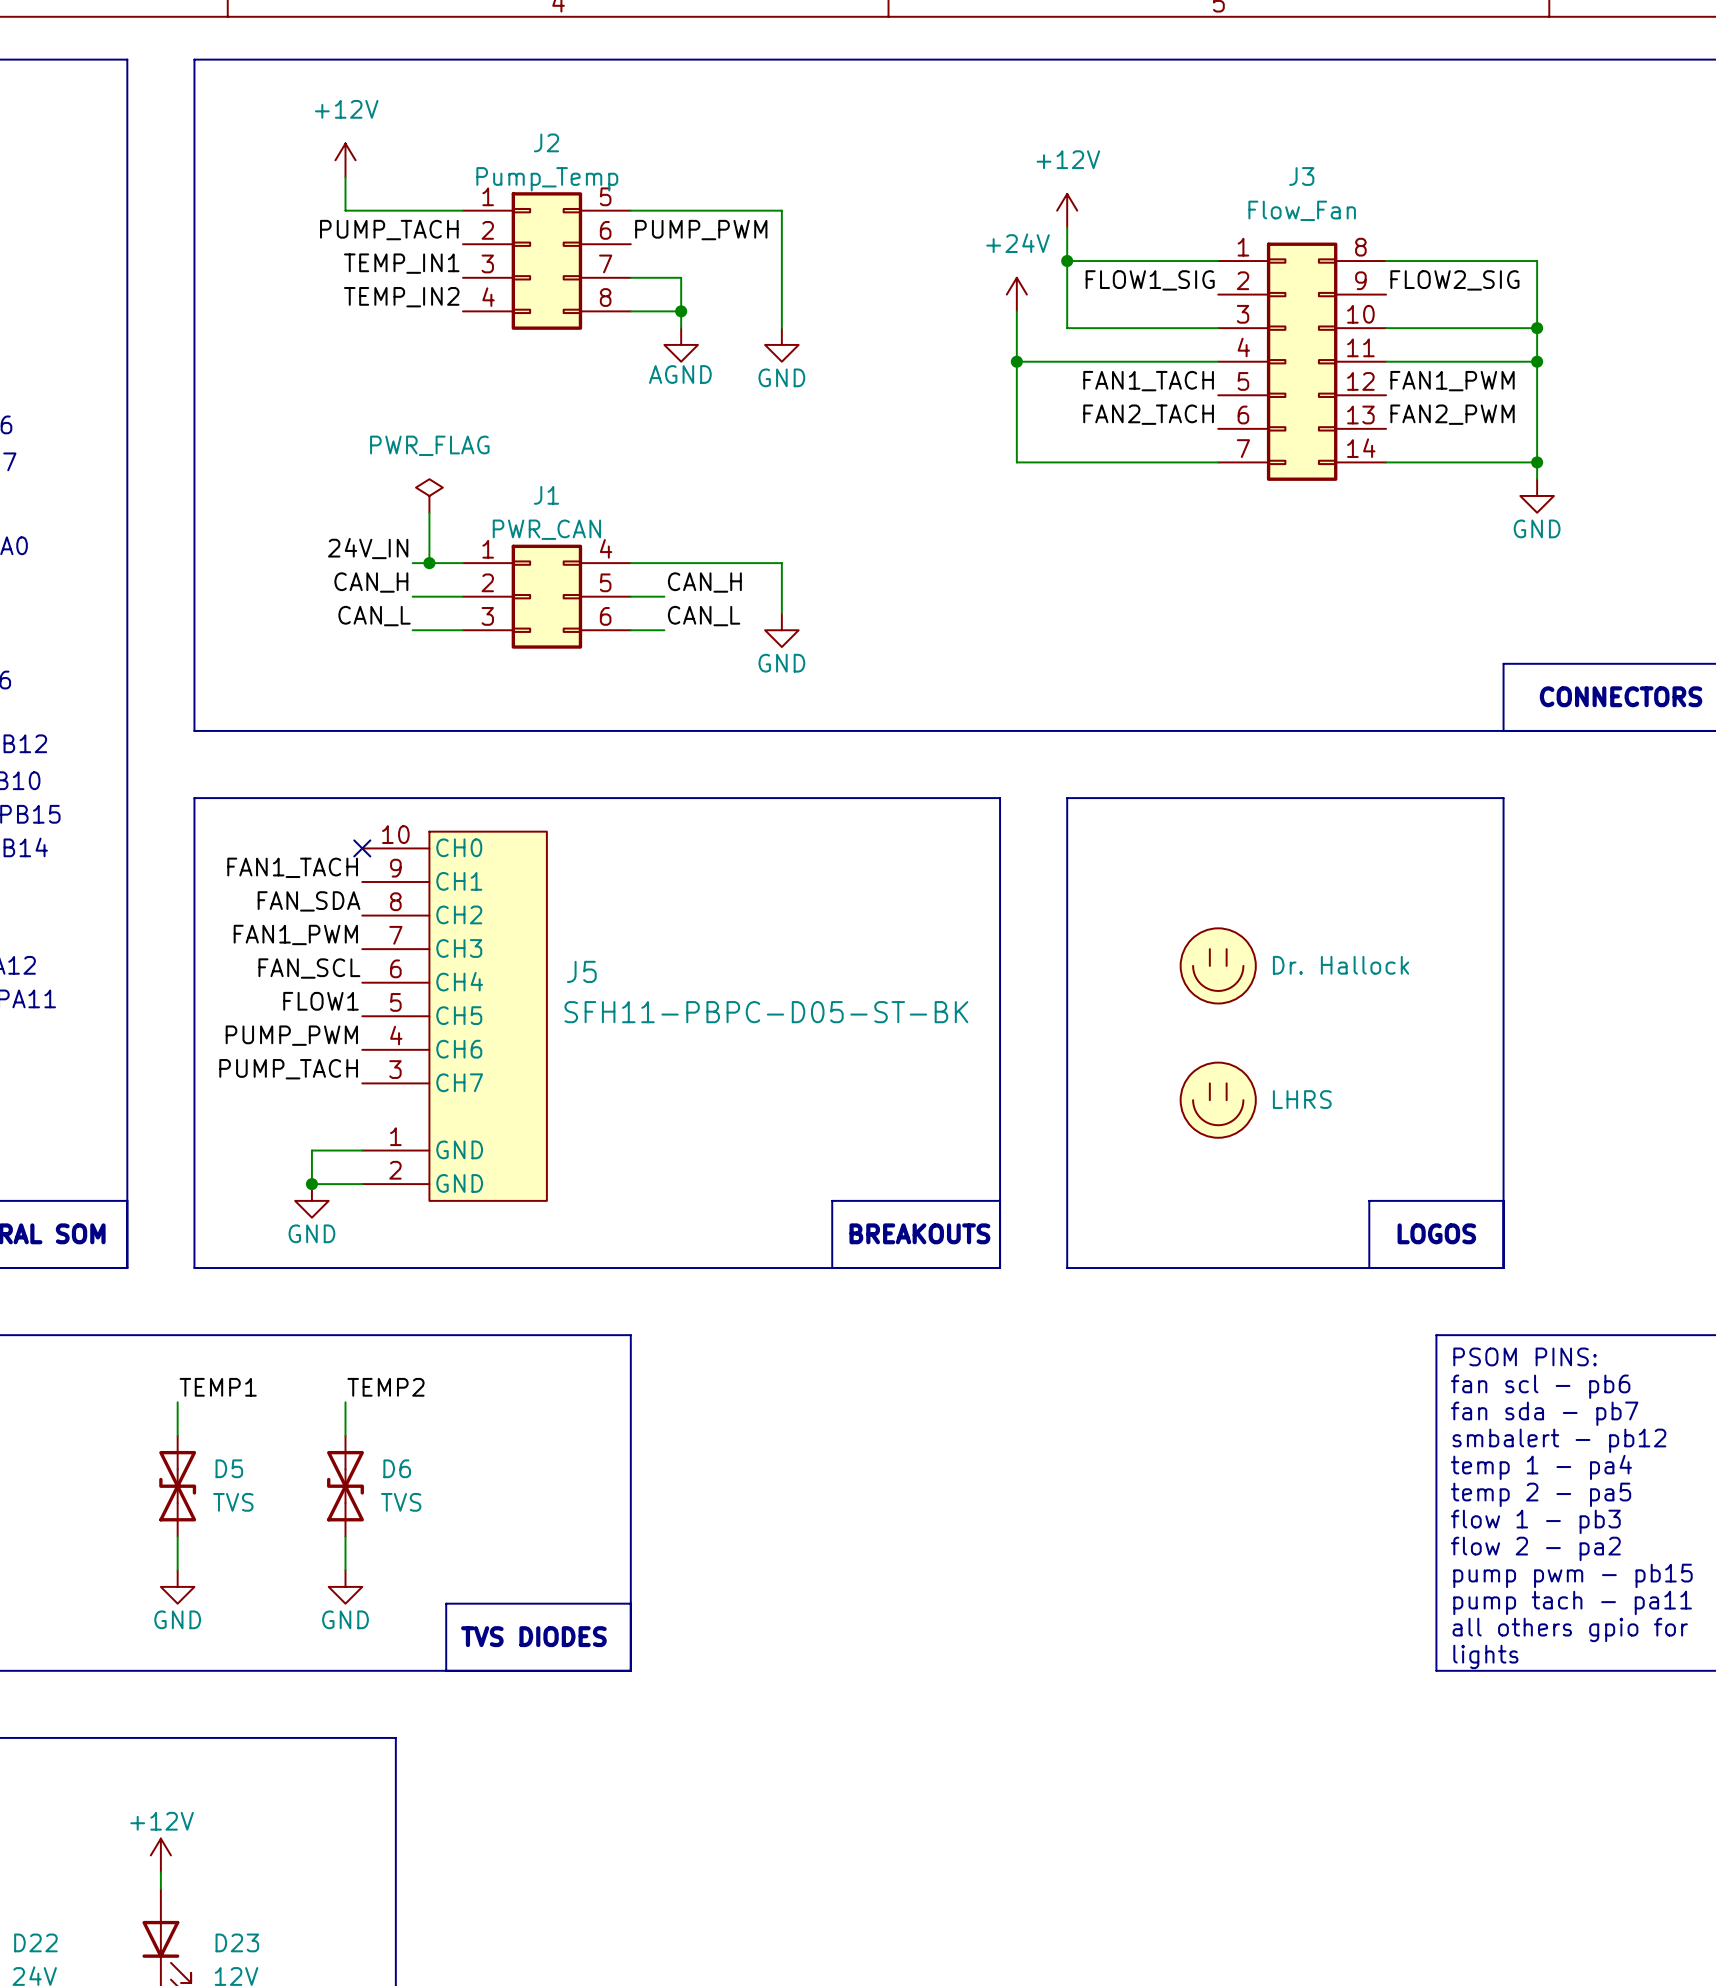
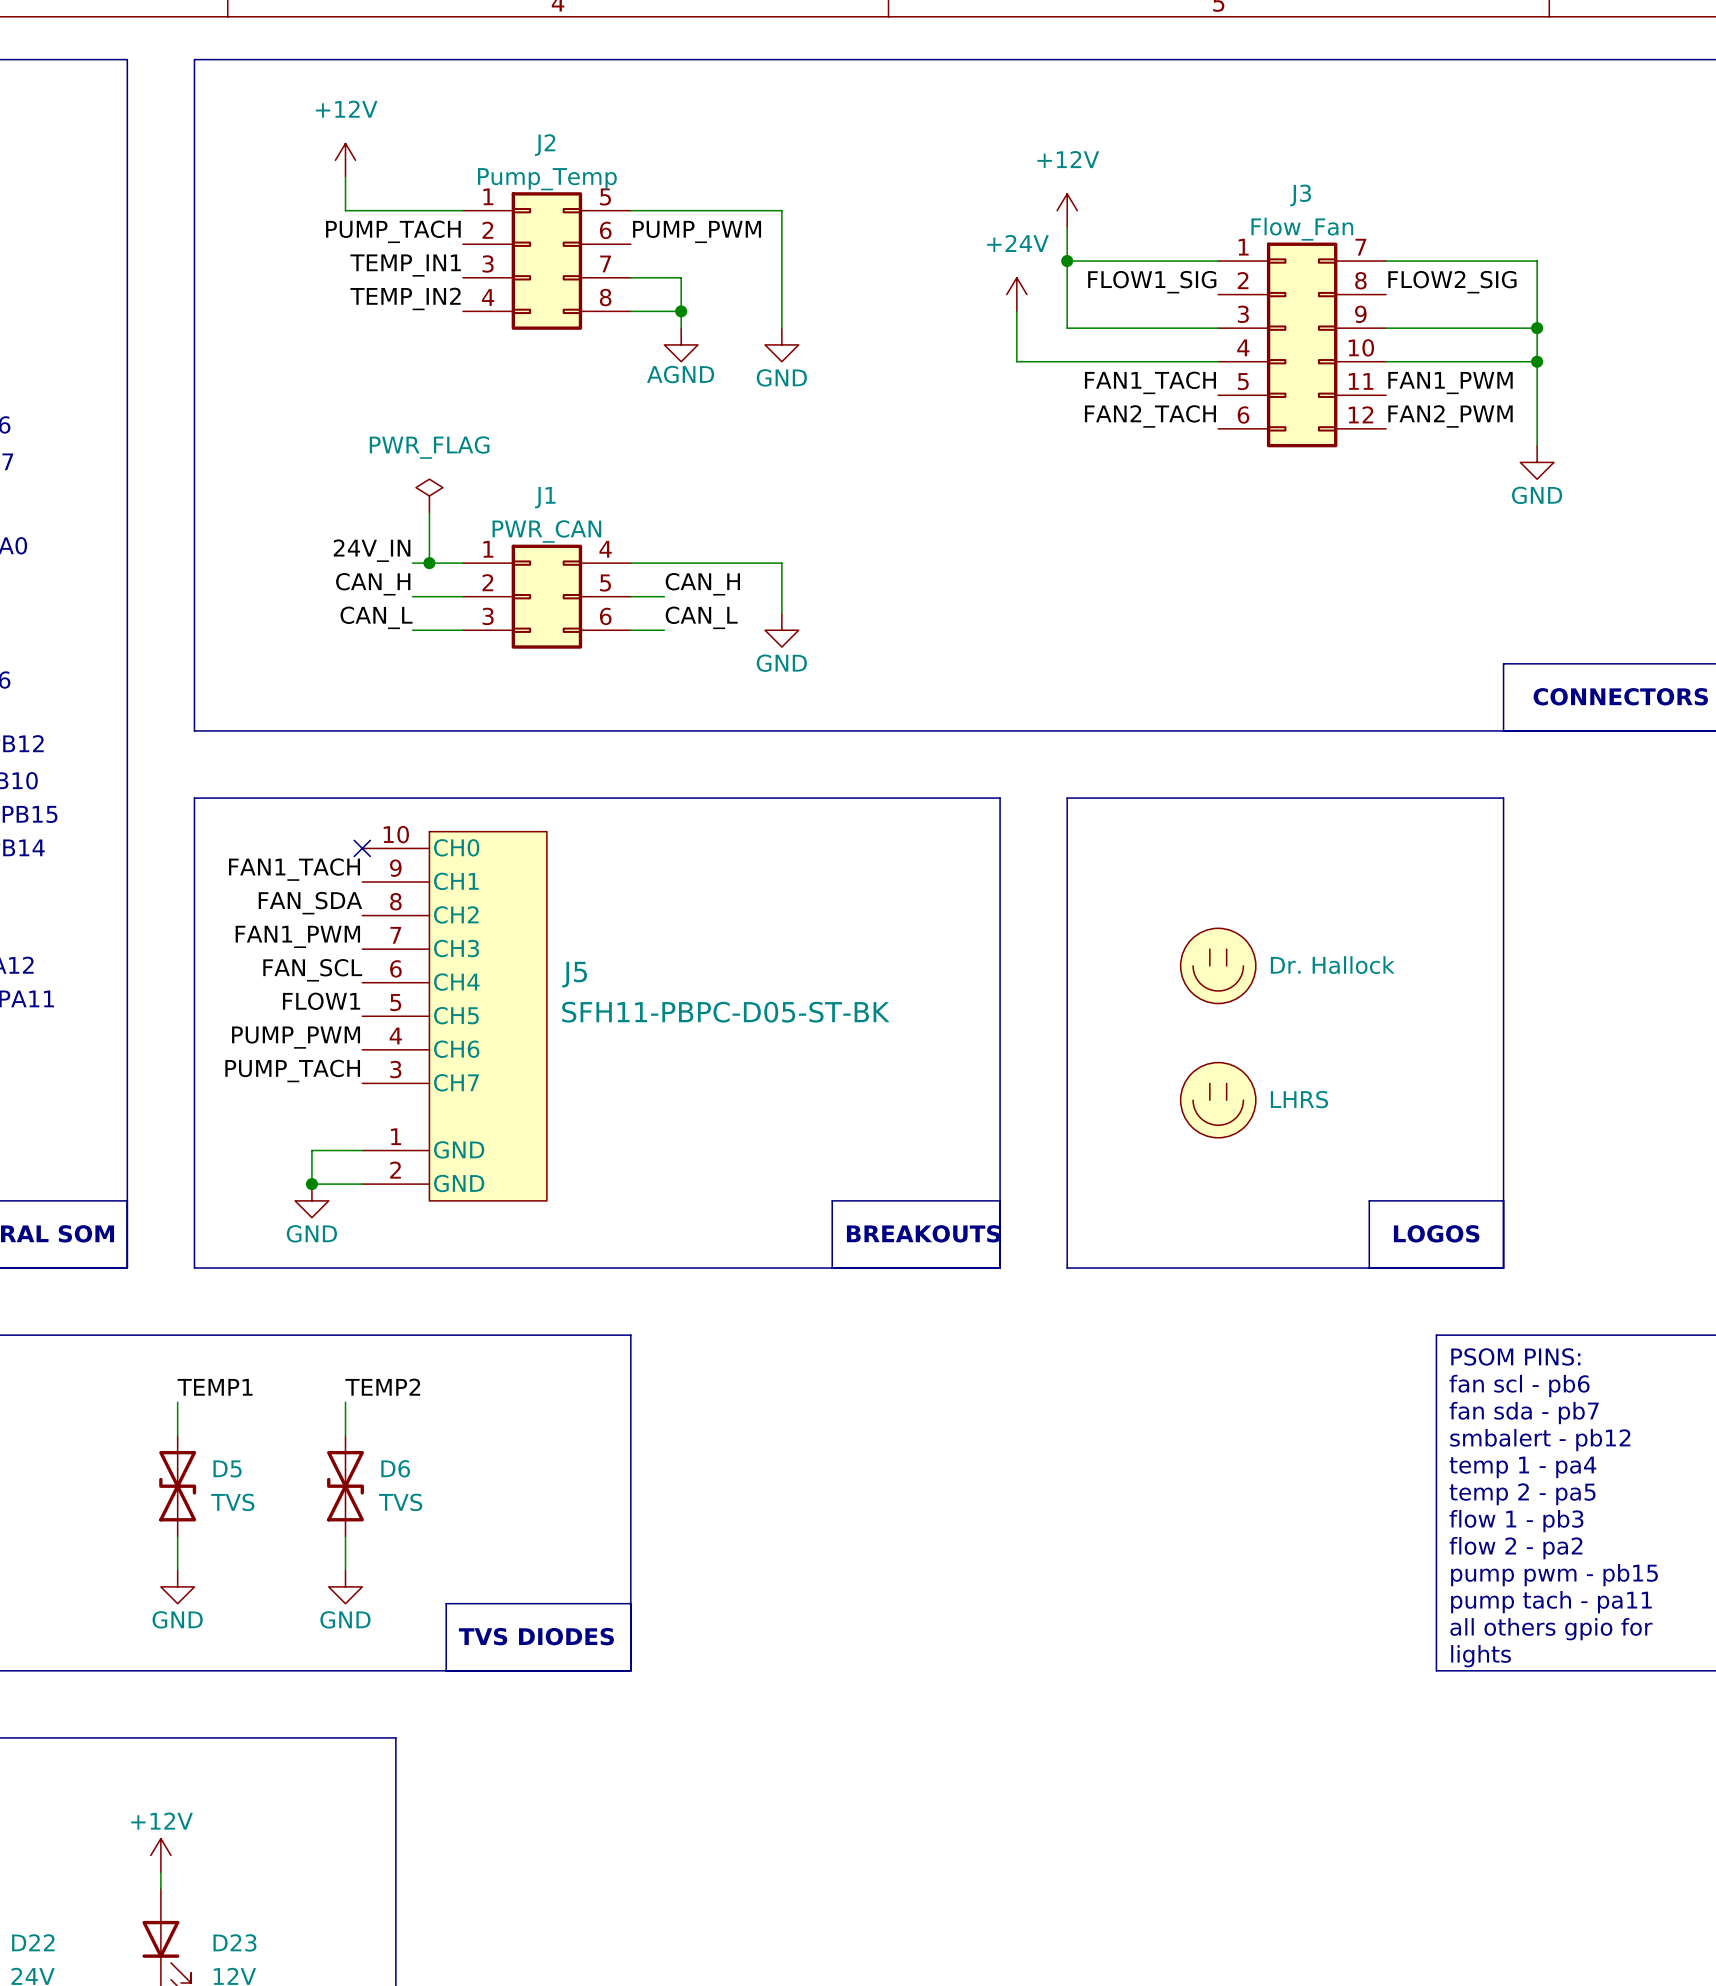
J3 name position: J3 (1301, 176) -> J3 (1300, 195)
J3 value position: Flow_Fan (1302, 210) -> Flow_Fan (1302, 229)
J3 symbol: [1218, 242, 1387, 481] -> [1218, 242, 1387, 448]
wire: (1016, 361) (1016, 462) (1218, 462) -> none
junction: (1016, 361) -> none
wire: (1386, 462) (1537, 462) -> none
junction: (1537, 462) -> none
power symbol position: GND (1537, 495) -> GND (1537, 462)

